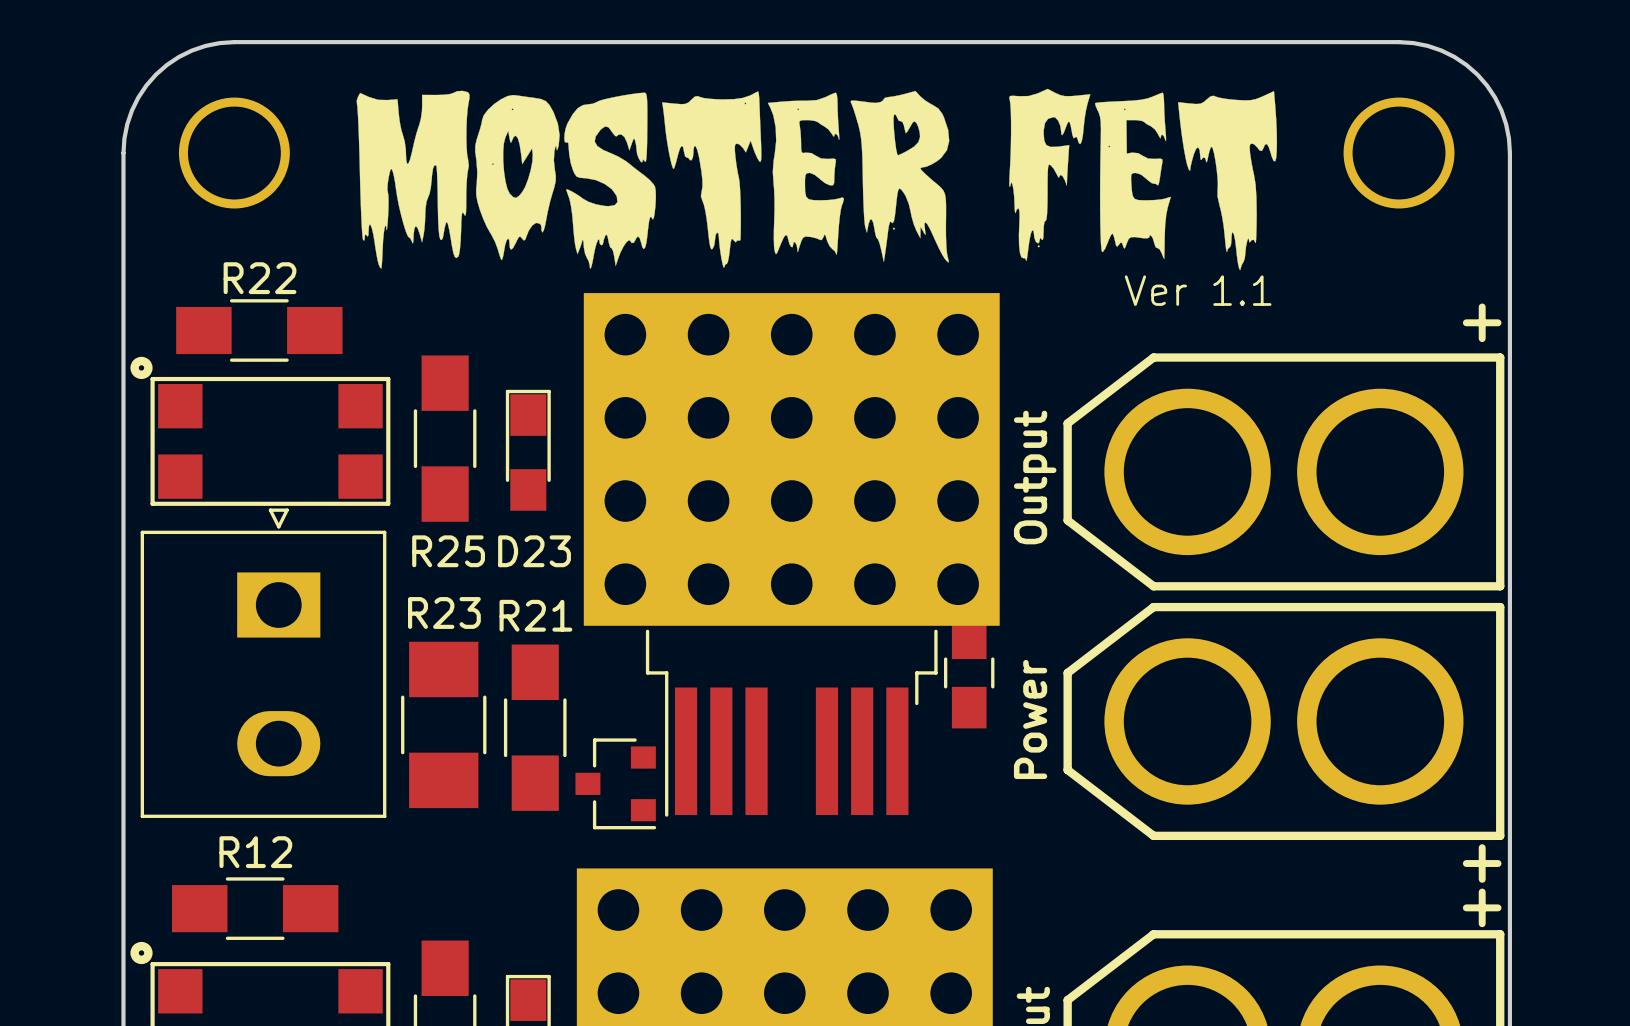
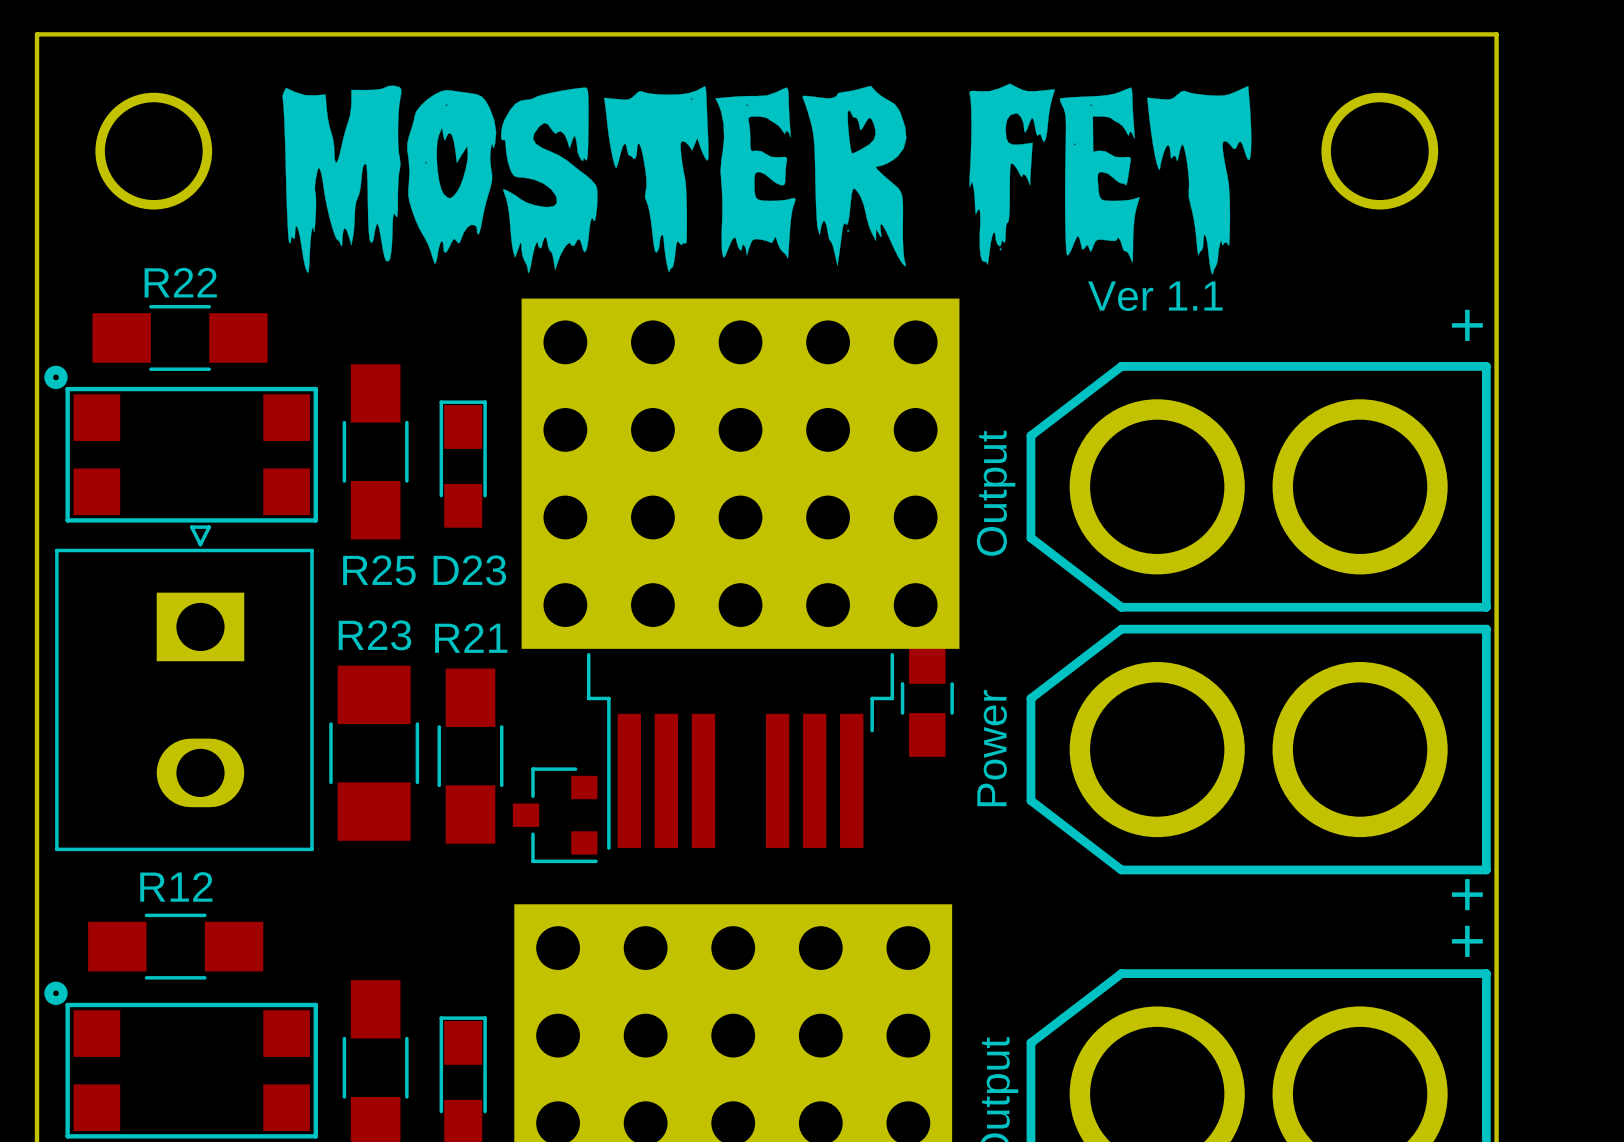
board edge: (234, 42) (219, 43) (191, 50) (178, 56) (155, 74) (146, 85) (131, 110) (127, 124) (123, 153) -> (153, 34) (37, 34) (37, 151)
board edge: (1399, 42) (1413, 43) (1441, 50) (1454, 56) (1477, 74) (1487, 85) (1501, 110) (1506, 124) (1509, 153) -> (1379, 34) (1496, 34) (1496, 151)

